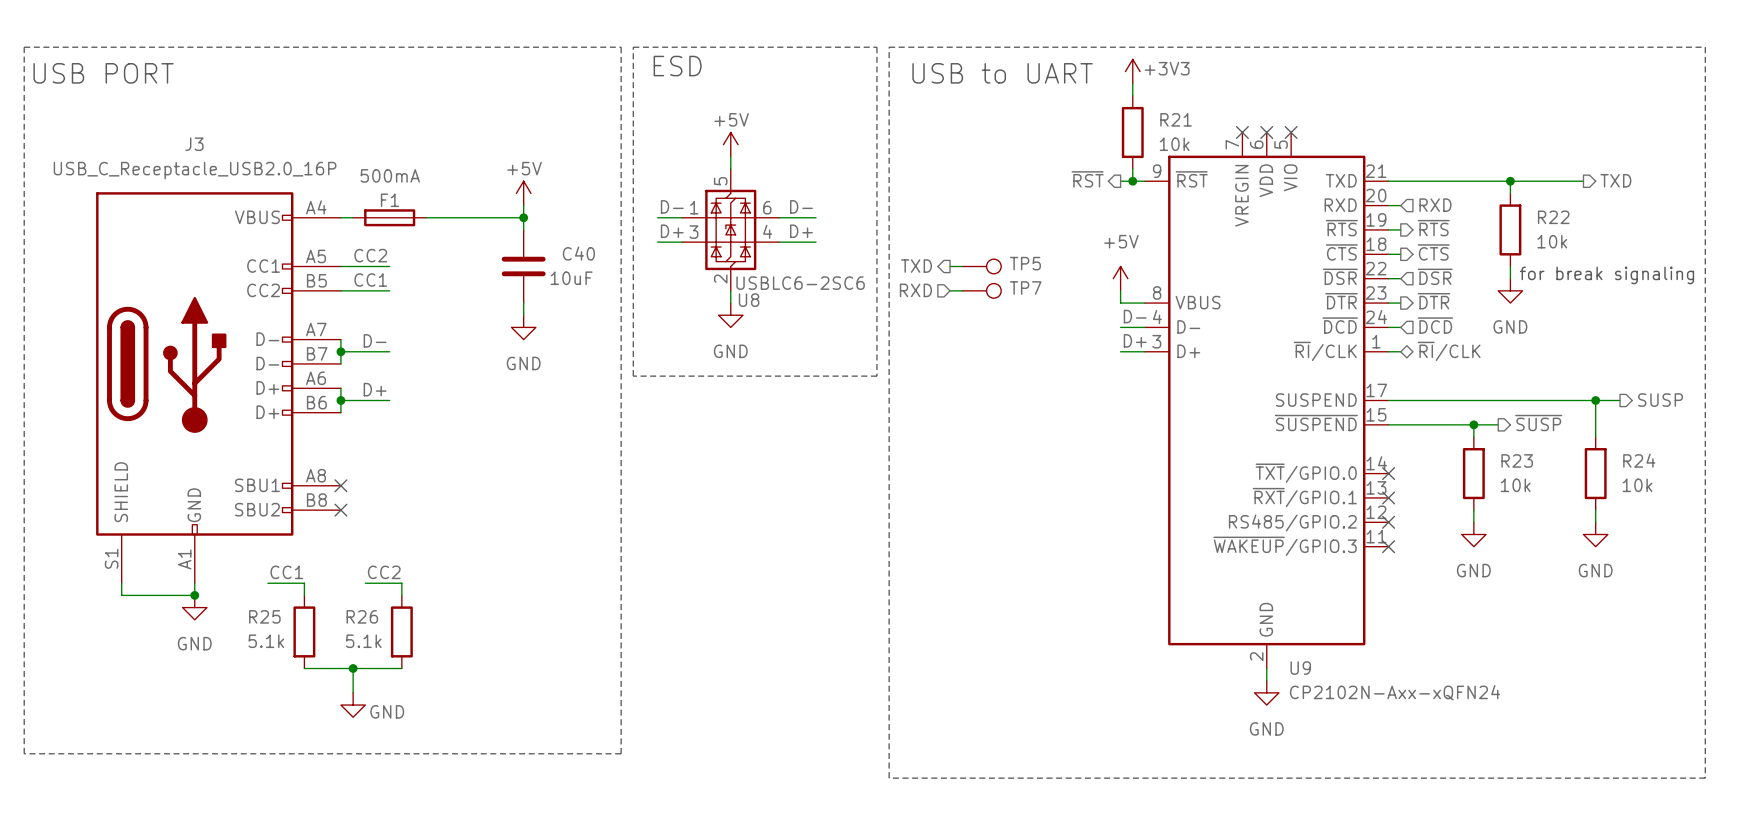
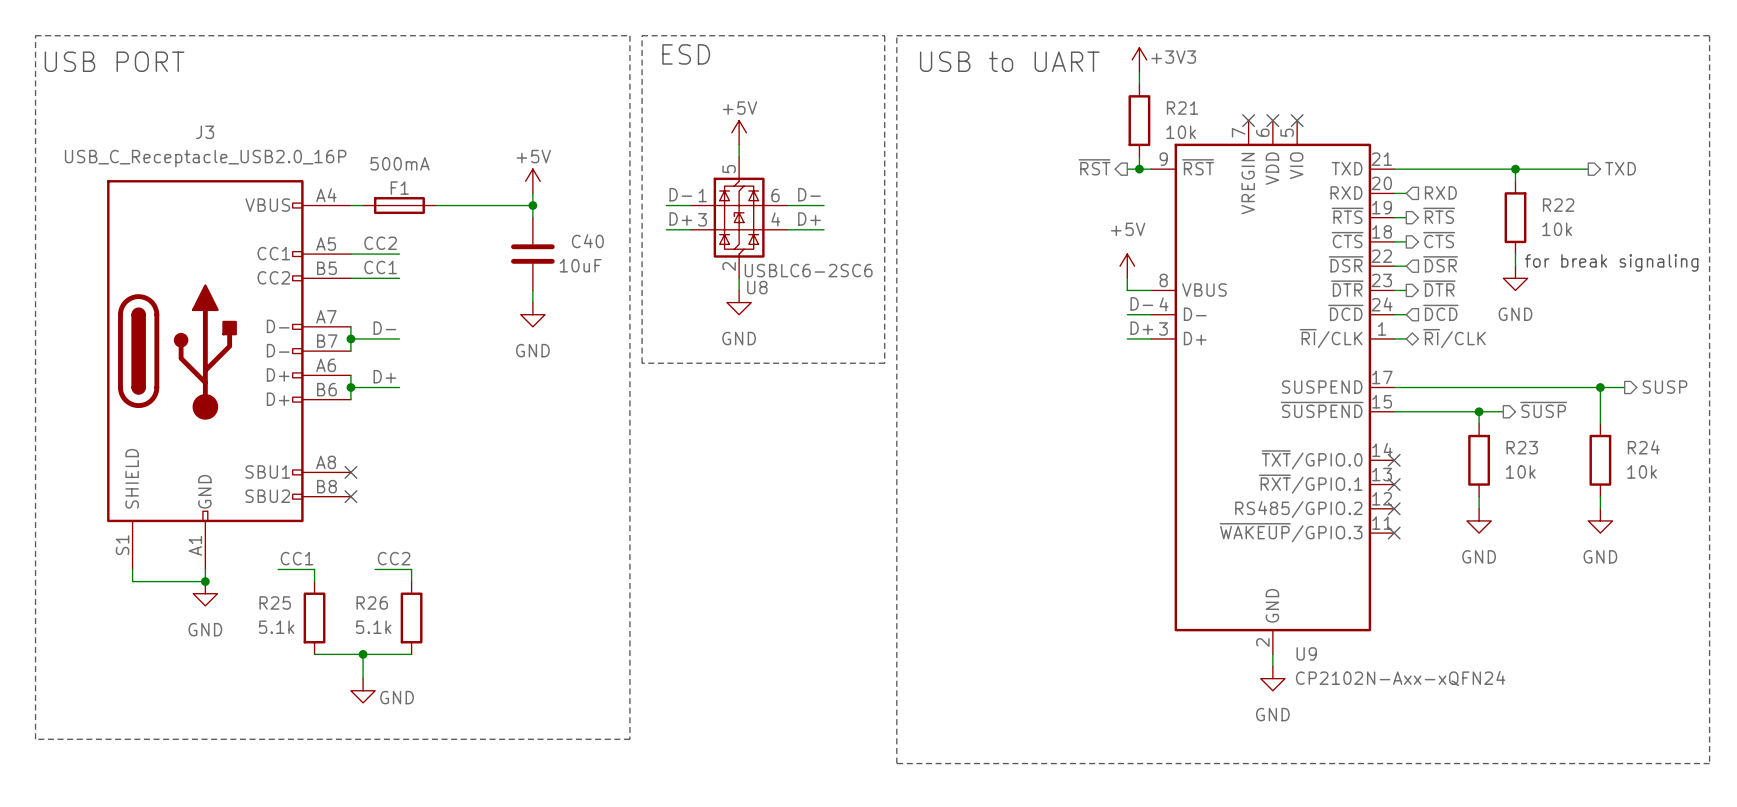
hierarchical label: TXD (916, 266) -> none
wire: (950, 266) (962, 266) -> none
TP5: (981, 266) -> none
hierarchical label: RXD (915, 290) -> none
wire: (950, 290) (962, 290) -> none
TP7: (981, 290) -> none

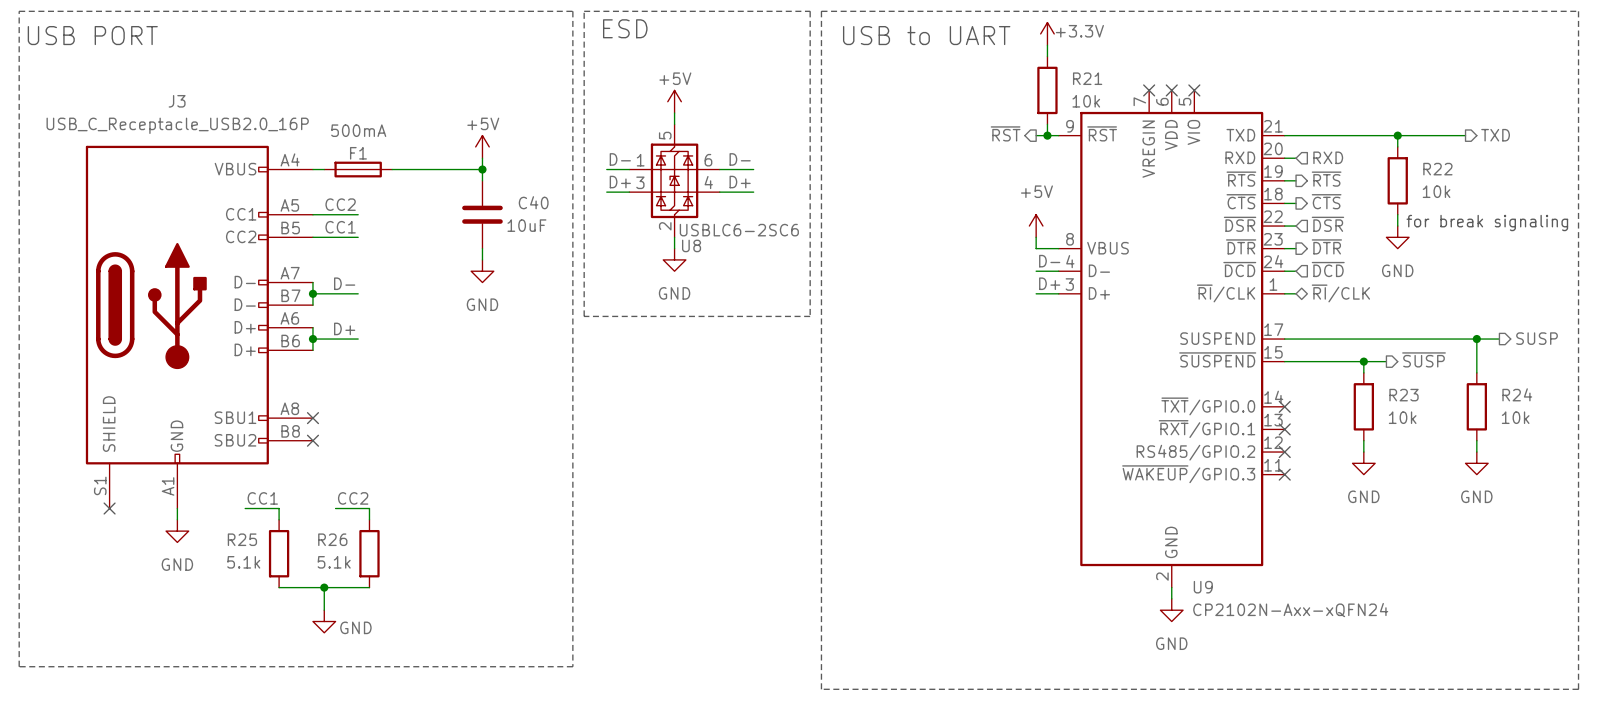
power symbol: +3V3 (1139, 59) -> +3.3V (1047, 33)
wire: (132, 569) (132, 581) (205, 581) -> none
no-connect mark: none -> (109, 508)
junction: (205, 581) -> none

